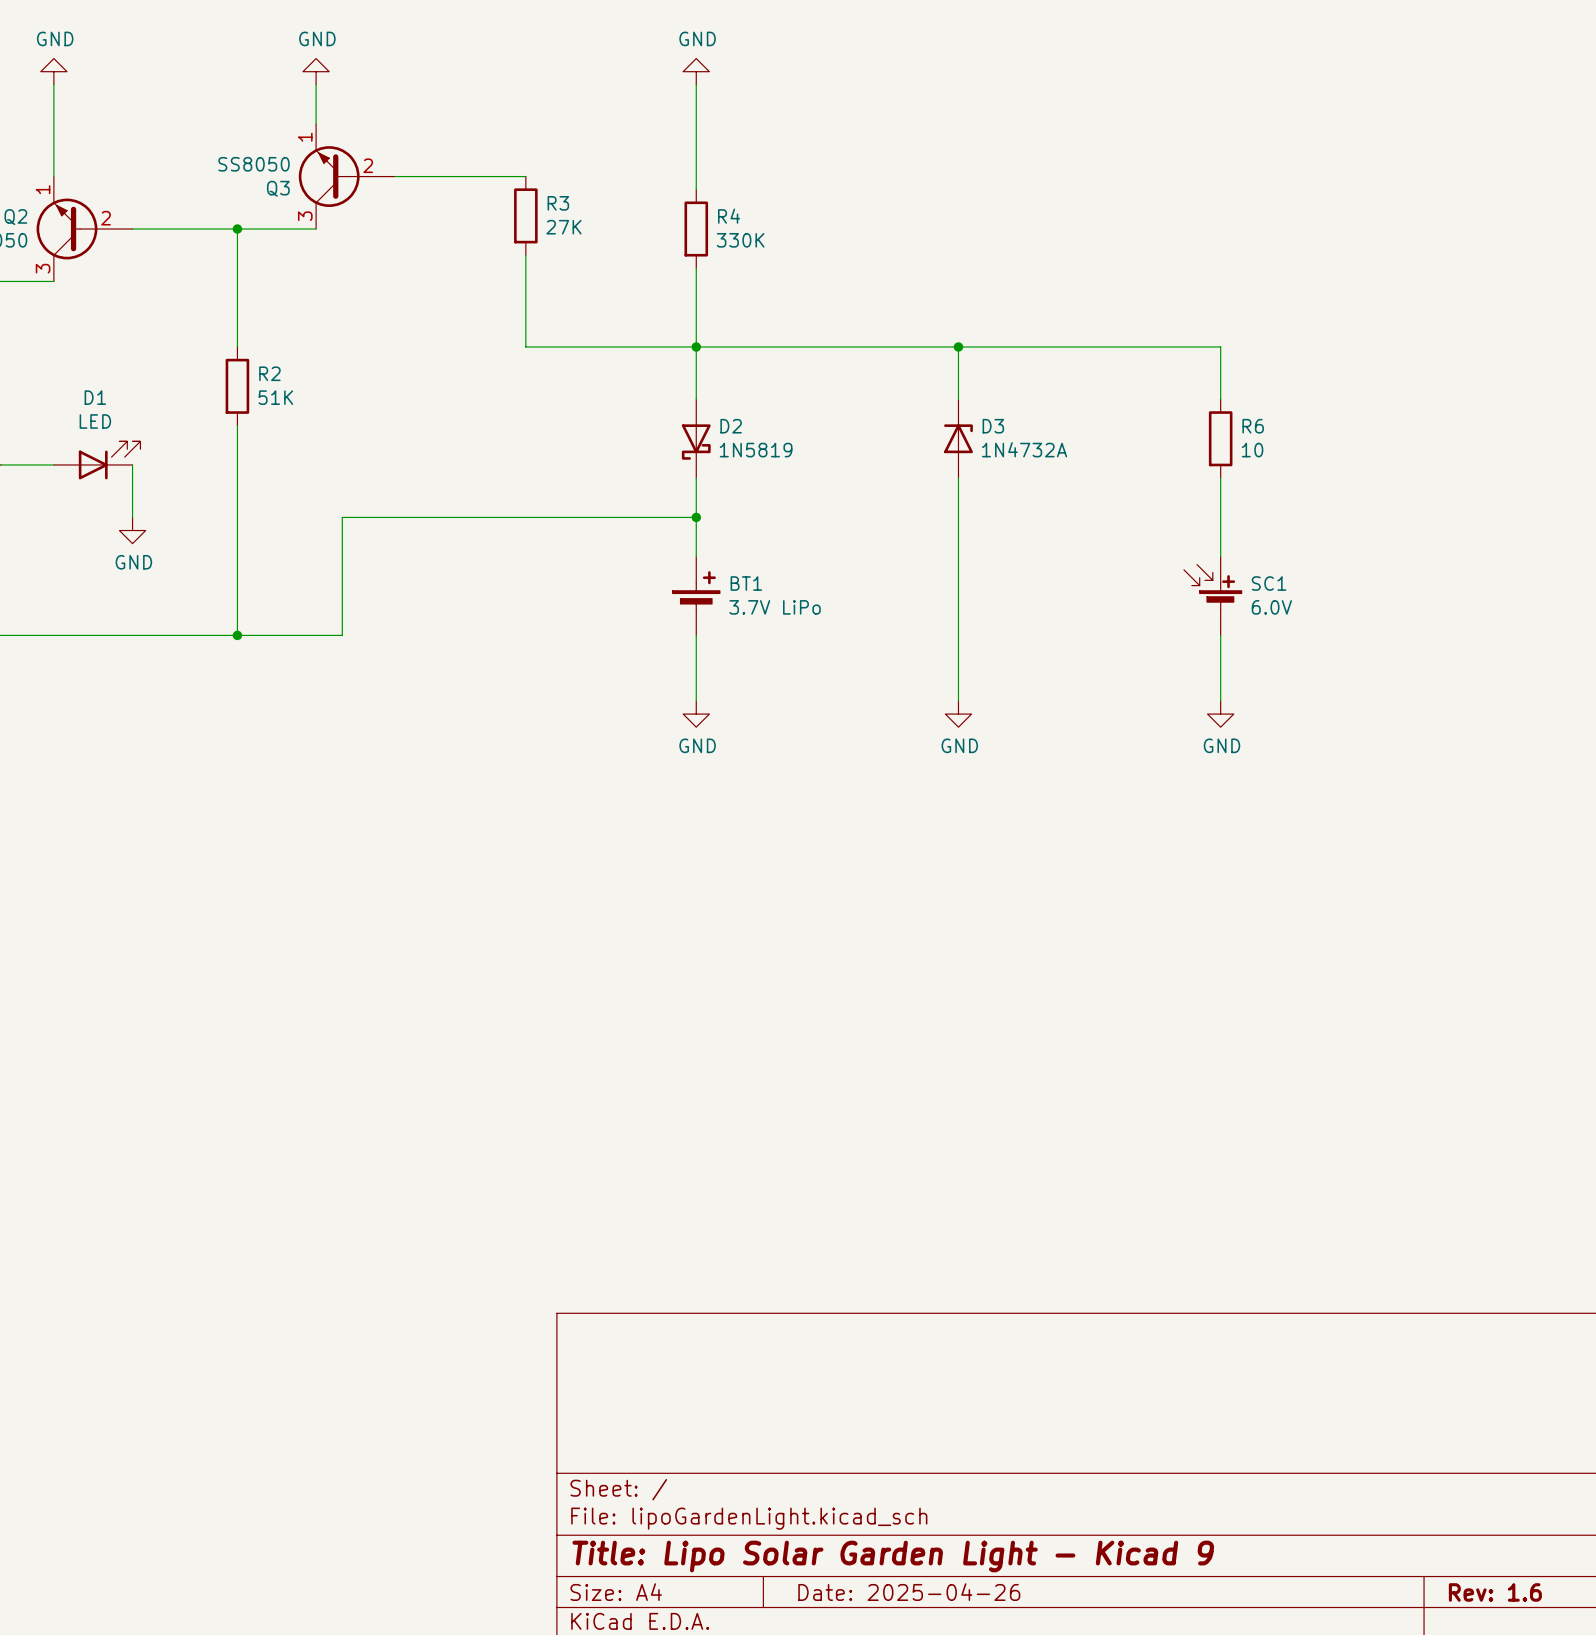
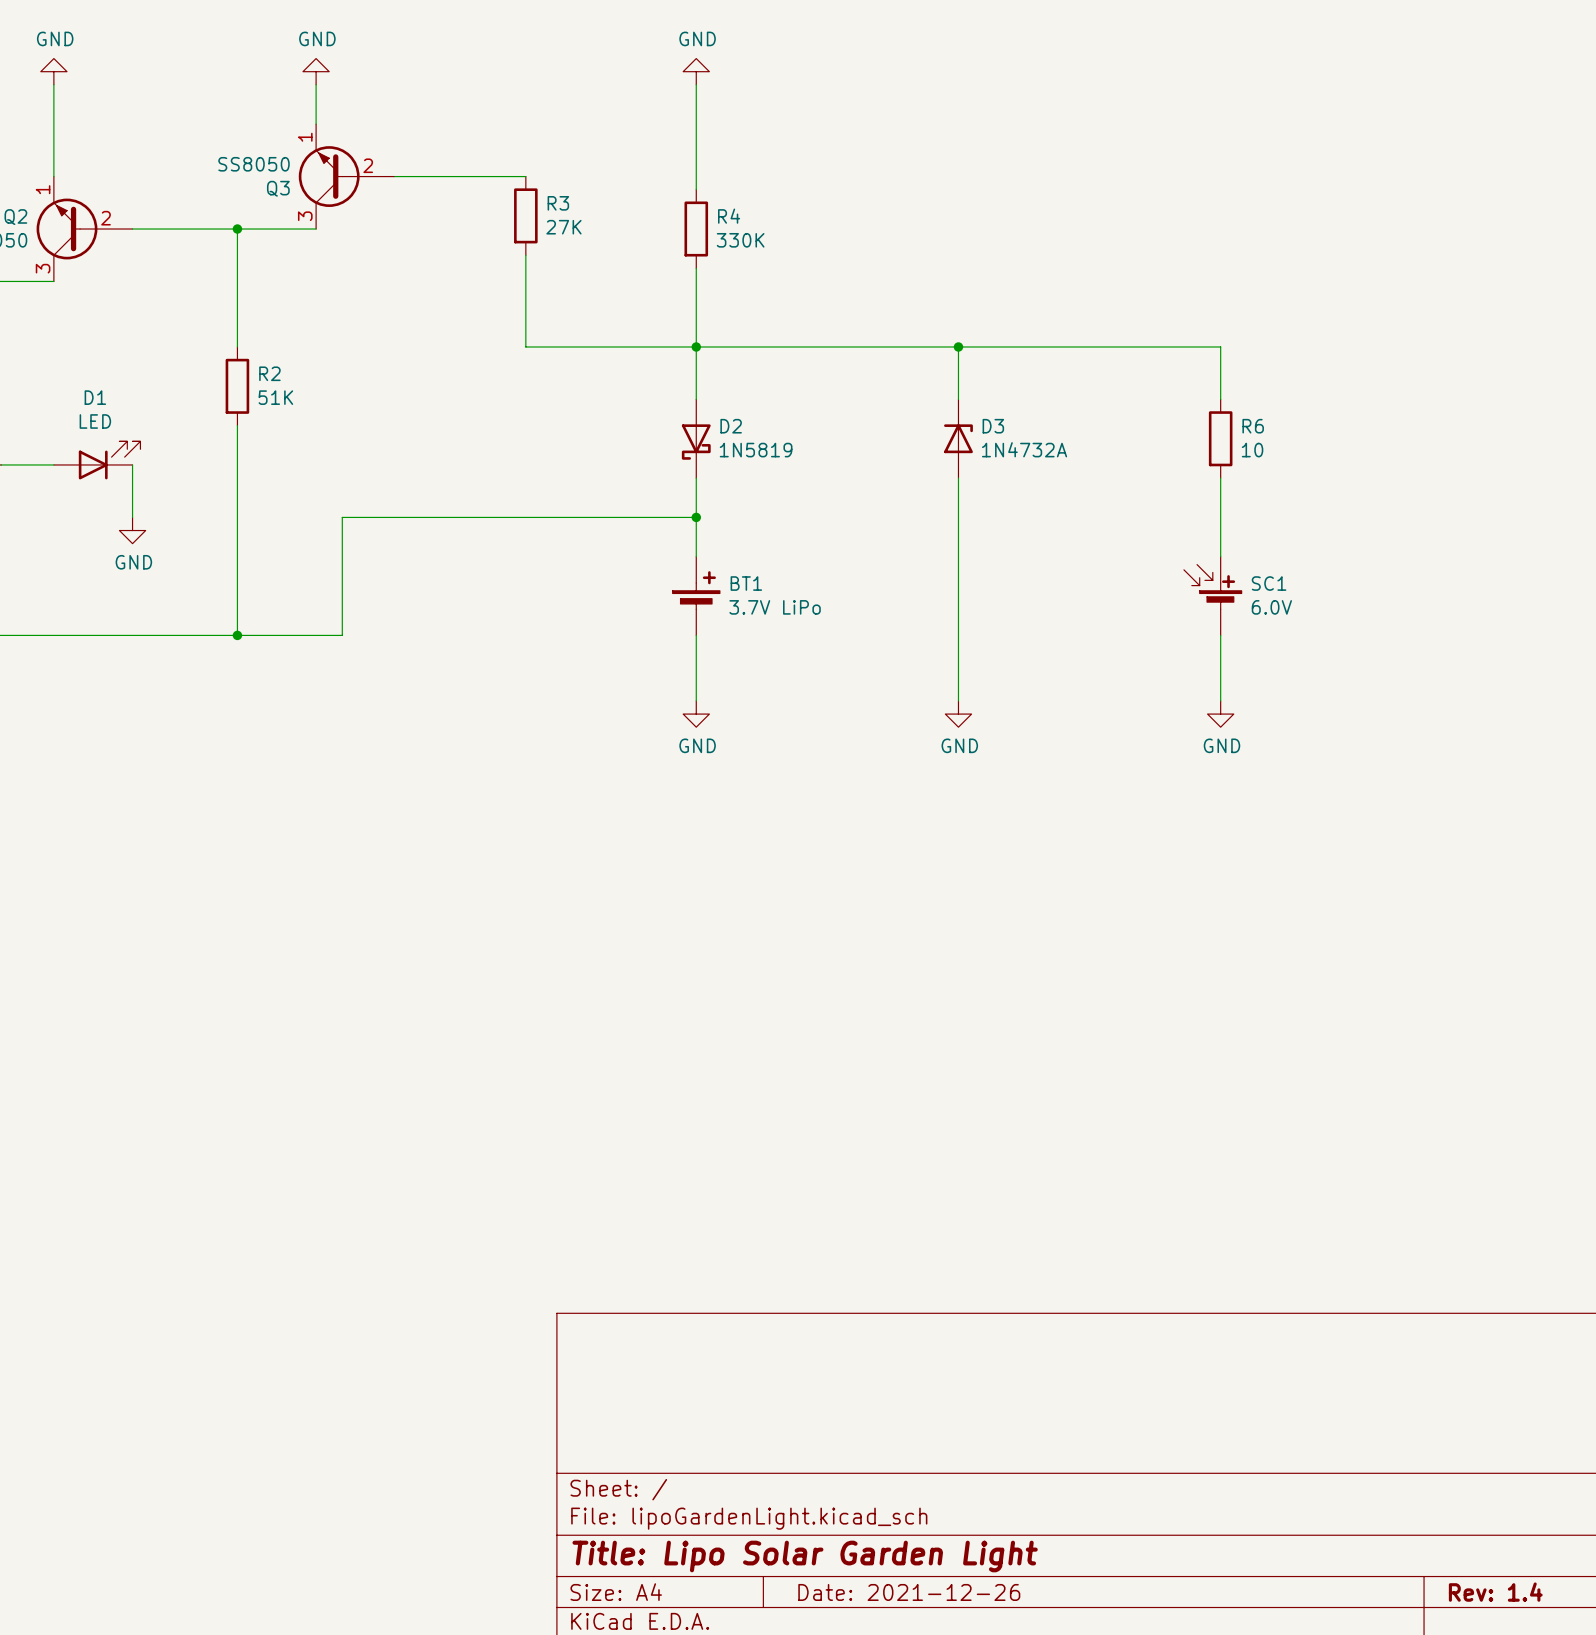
title block: Title: Lipo Solar Garden Light - Kicad 9 (893, 1556) -> Title: Lipo Solar Garden Light (805, 1556)
title block: Date: 2025-04-26 (909, 1592) -> Date: 2021-12-26 (909, 1592)
title block: Rev: 1.6 (1495, 1592) -> Rev: 1.4 (1495, 1592)

